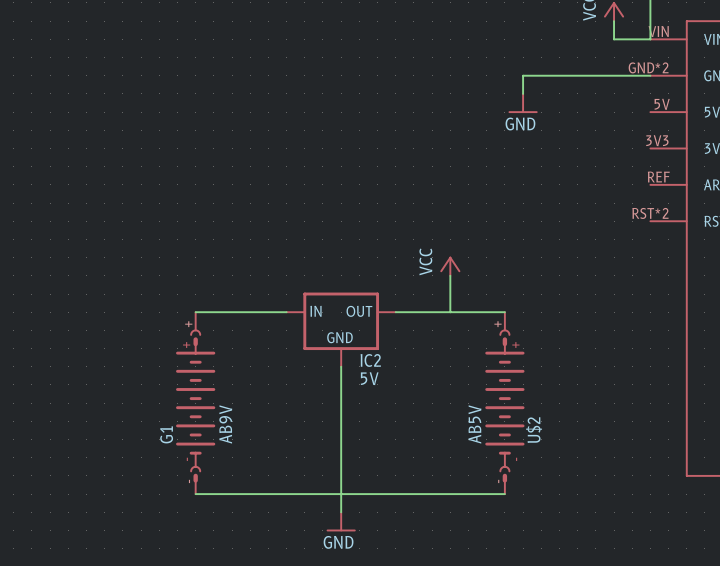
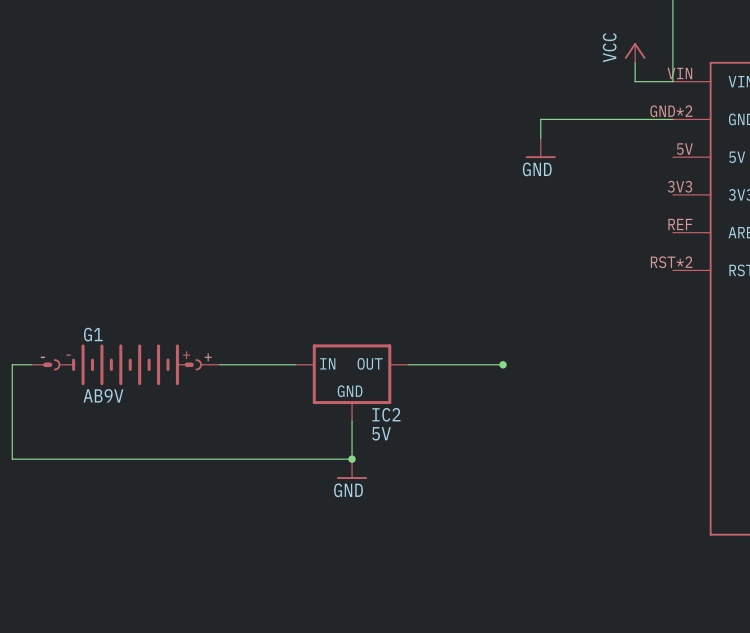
power symbol: VCC (450, 266) -> none
wire: (450, 275) (450, 312) -> none
wire: (486, 312) (504, 312) -> none
junction: none -> (503, 364)
G1 position: (195, 403) -> (125, 364)
wire: (341, 403) (341, 512) -> (352, 459) (12, 459) (12, 364) (31, 364)
junction: none -> (352, 459)
U$2: AB5V (504, 403) -> none
G1 rotation: 0° (195, 406) -> 90° clockwise (122, 364)
wire: (195, 494) (504, 494) -> none
power symbol position: GND (341, 521) -> GND (352, 469)

